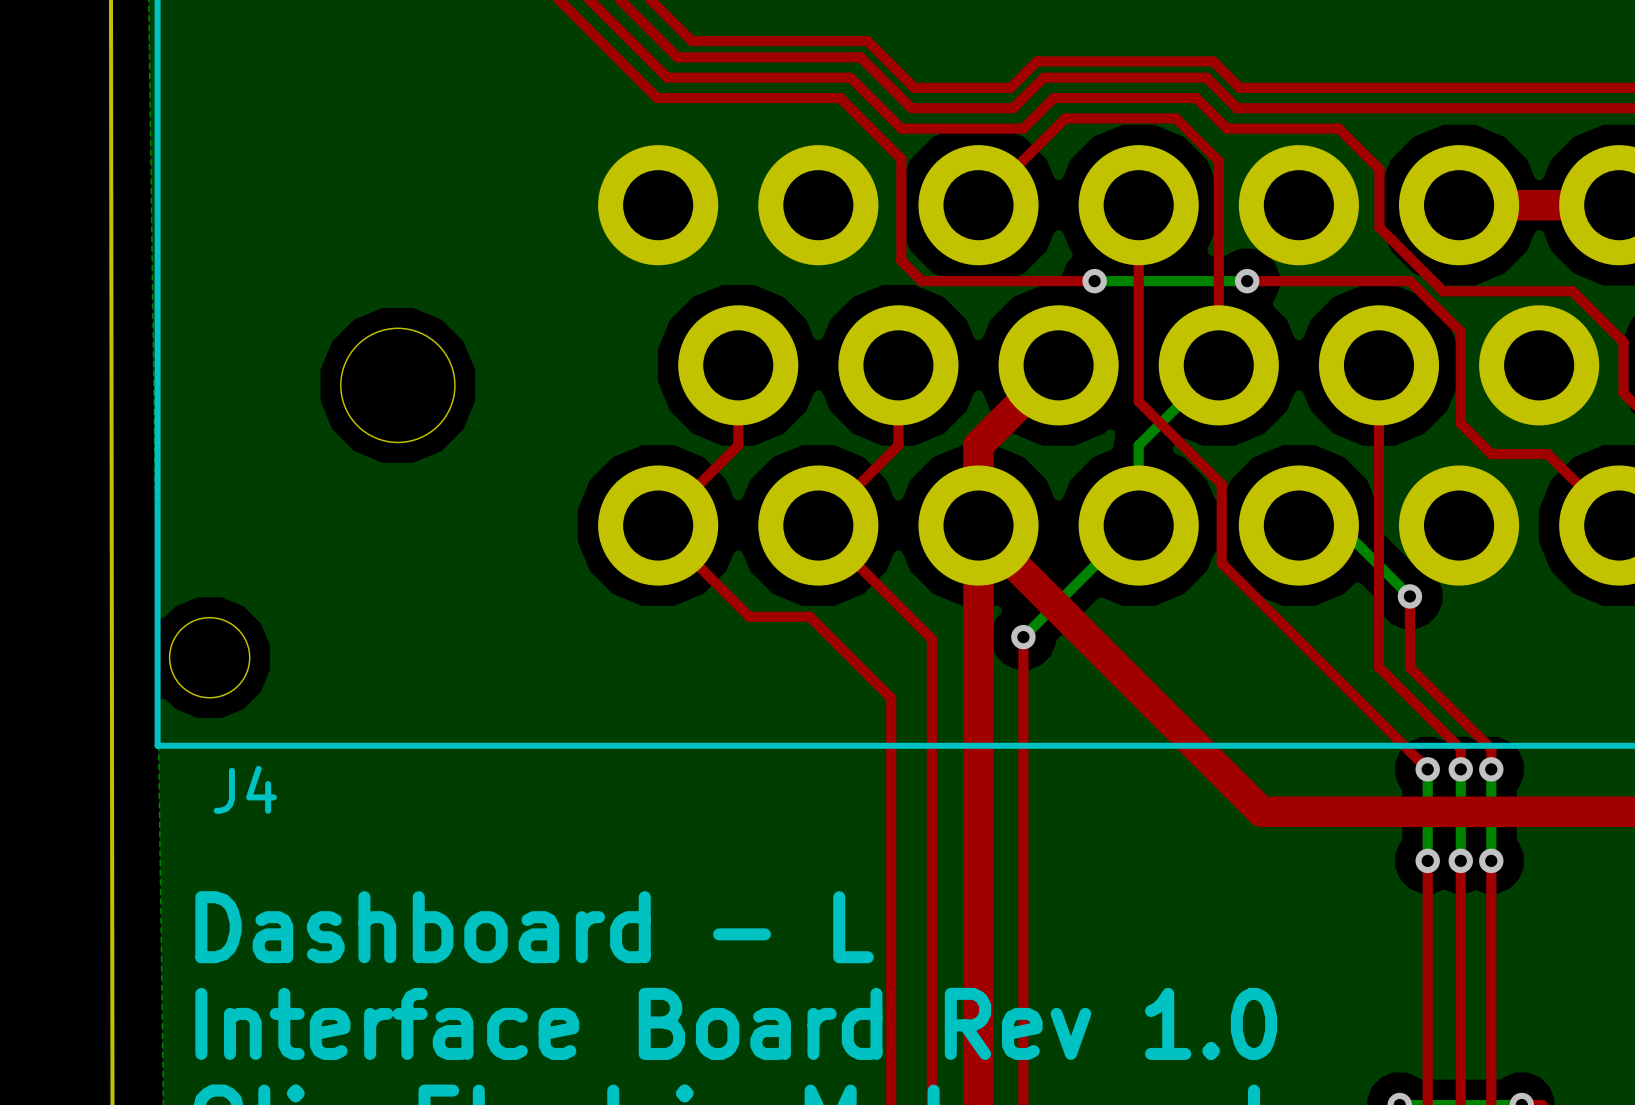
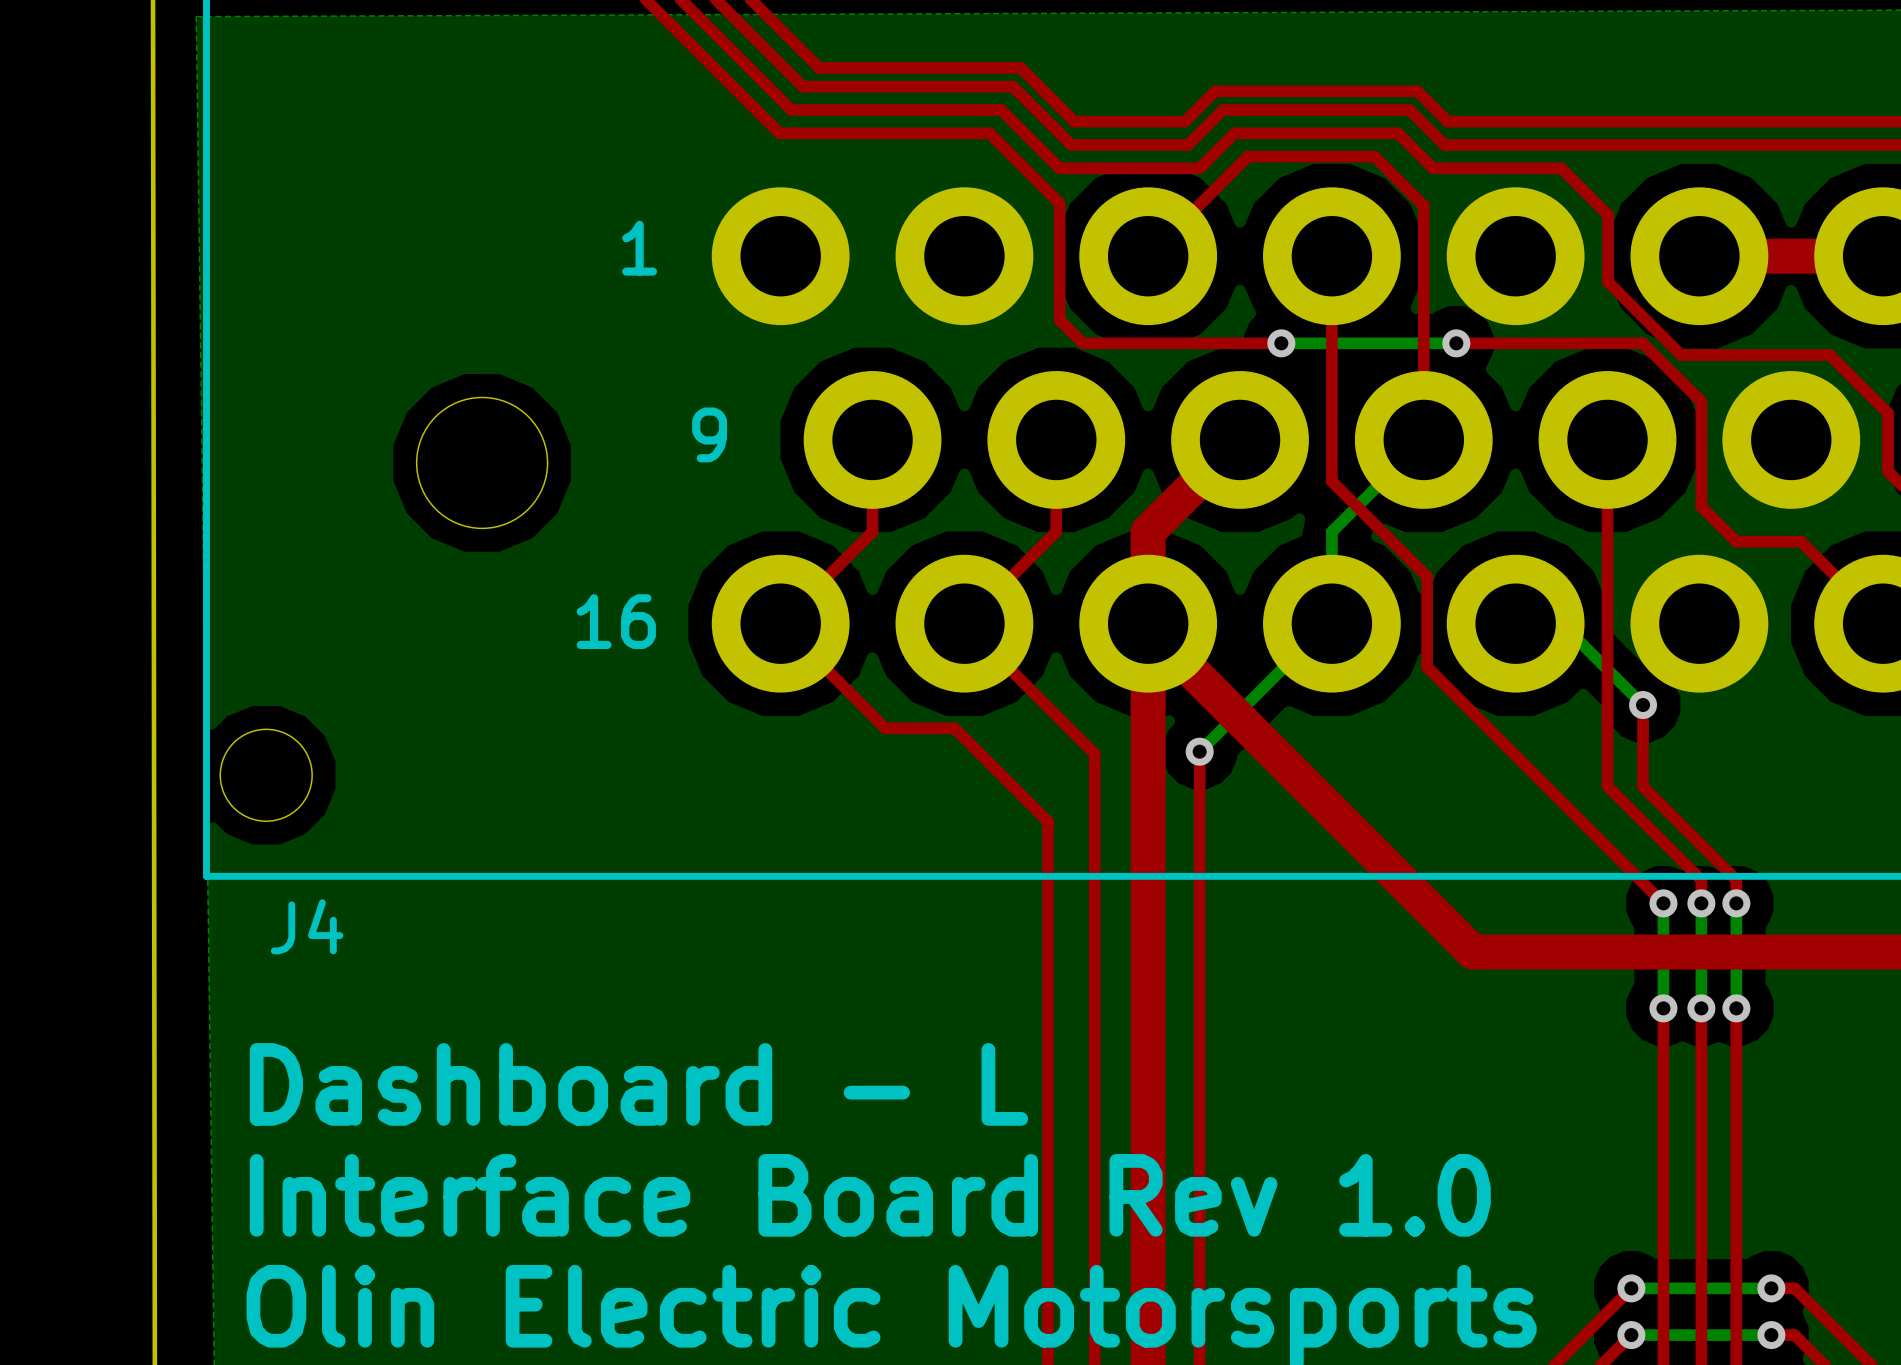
text: none -> 1 (639, 248)
text: none -> 9 (709, 434)
text: none -> 16 (616, 621)

